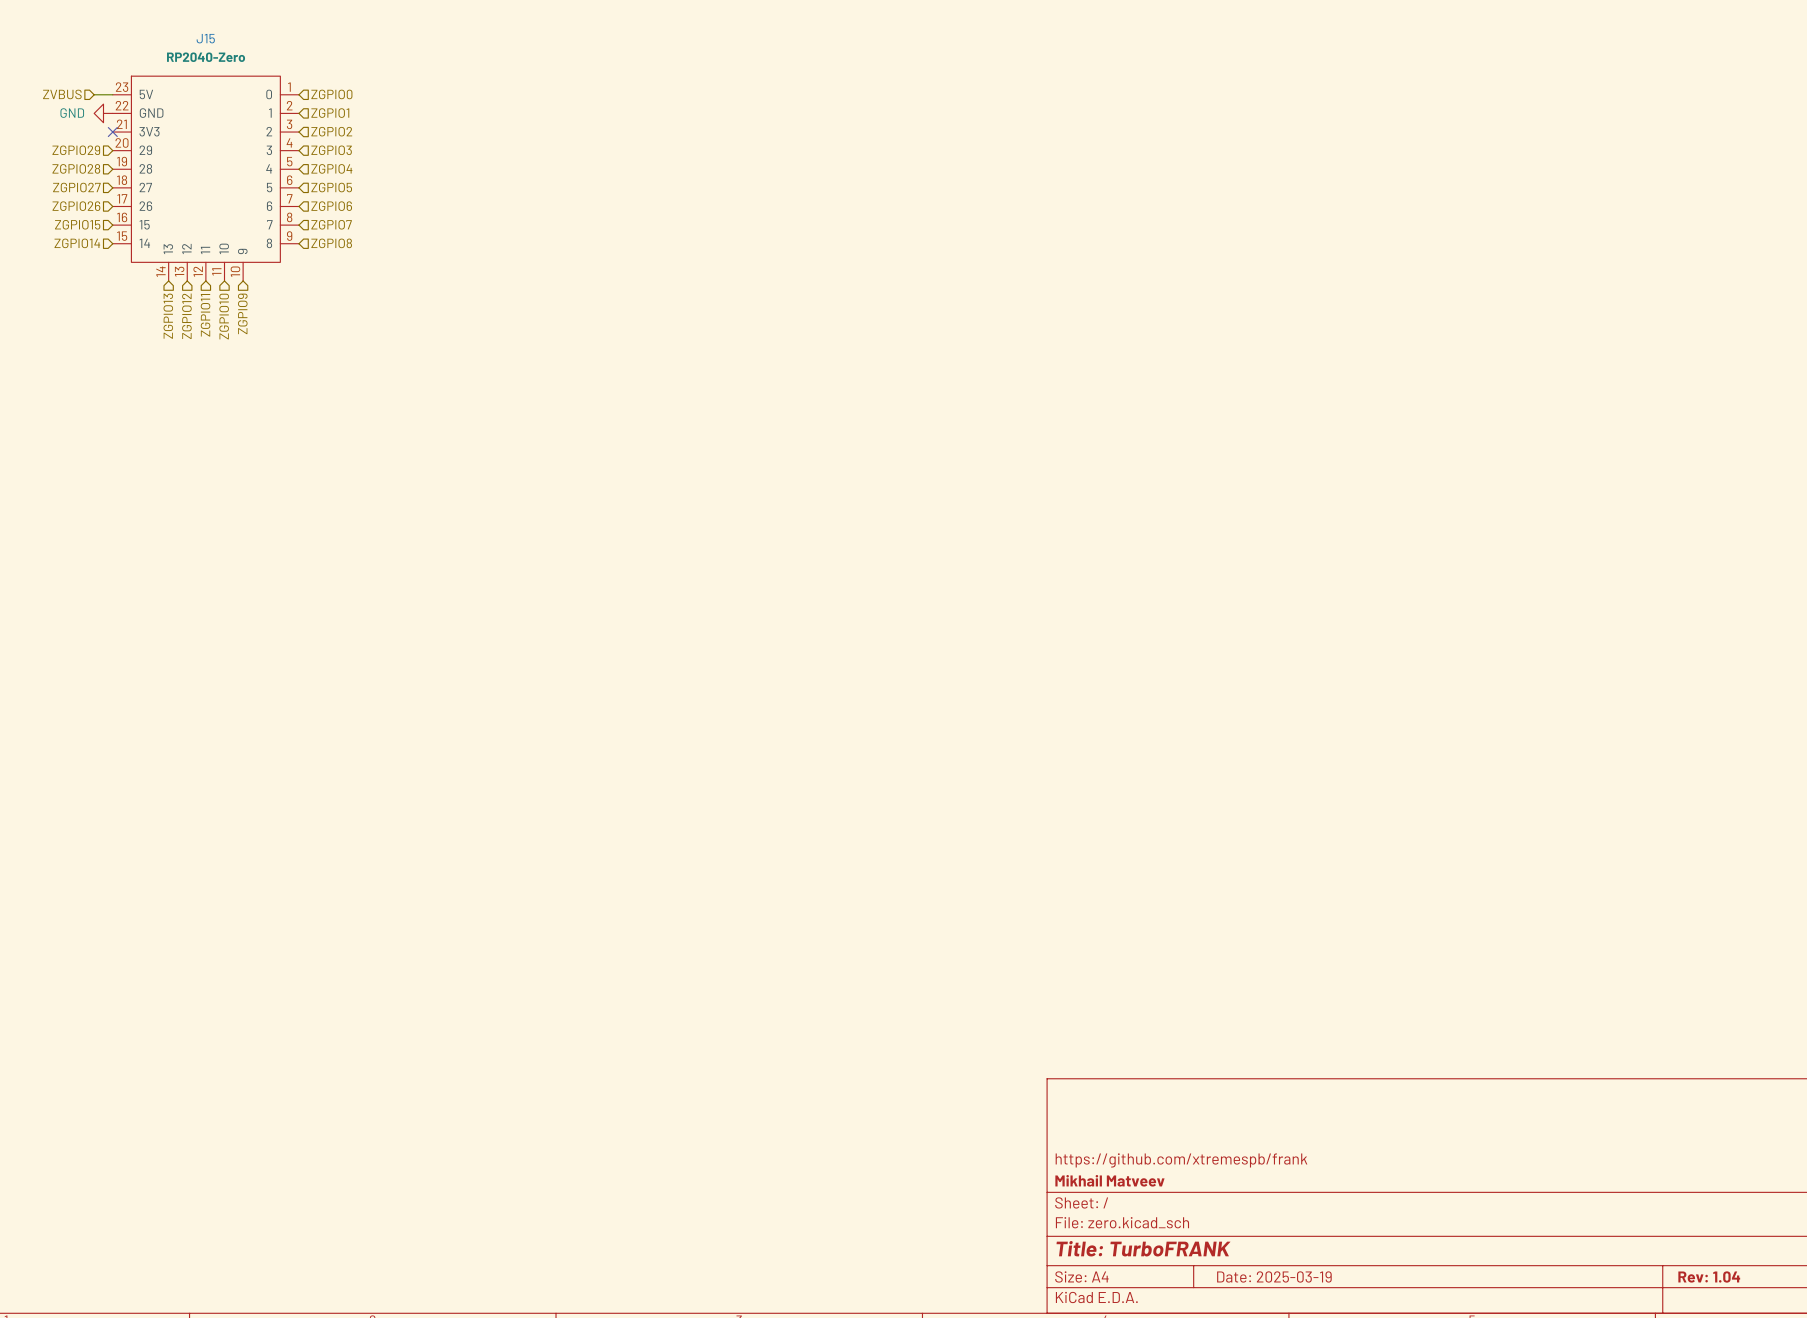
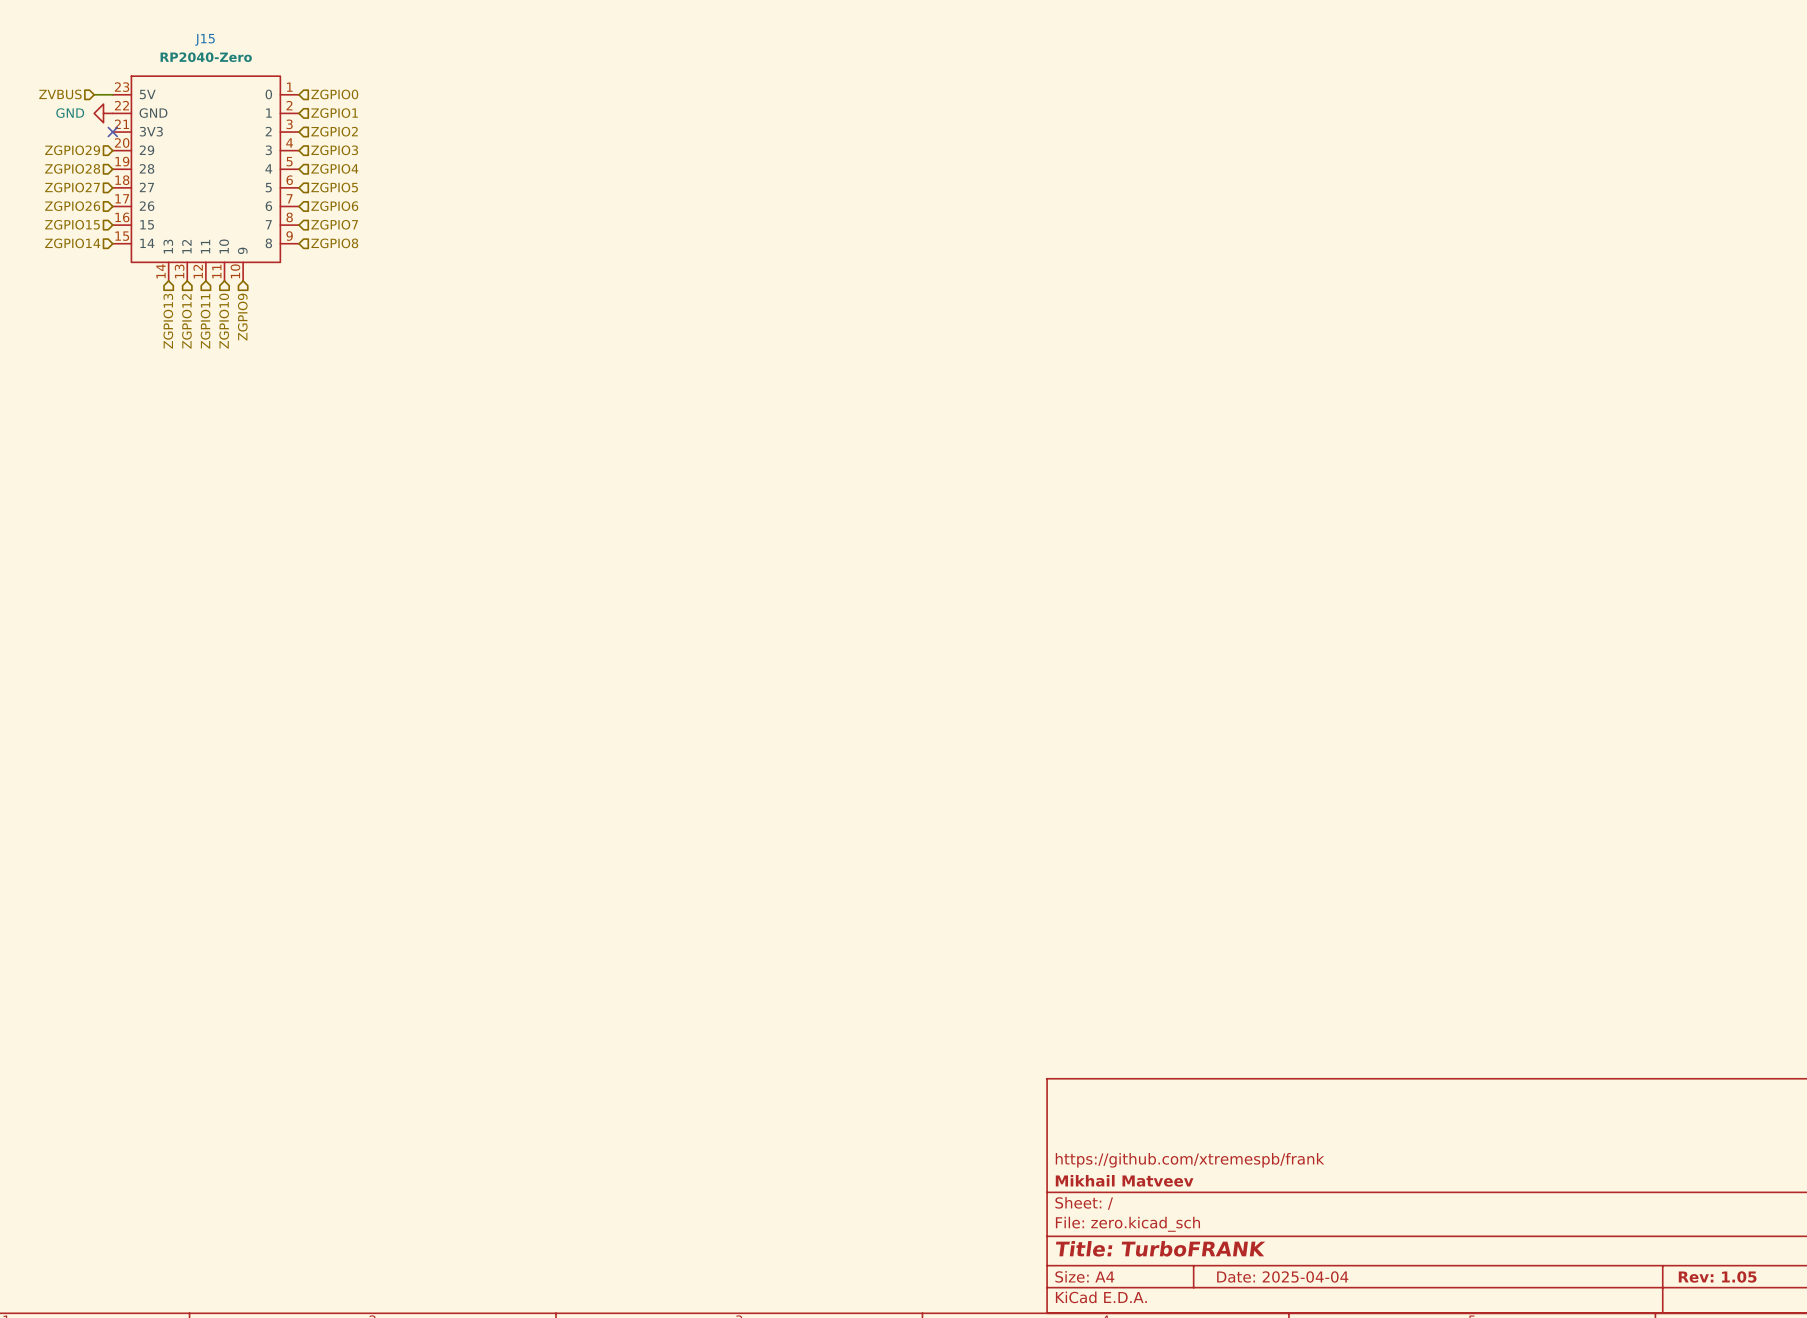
title block: Date: 2025-03-19 (1274, 1276) -> Date: 2025-04-04 (1282, 1276)
title block: Rev: 1.04 (1709, 1276) -> Rev: 1.05 (1717, 1276)

